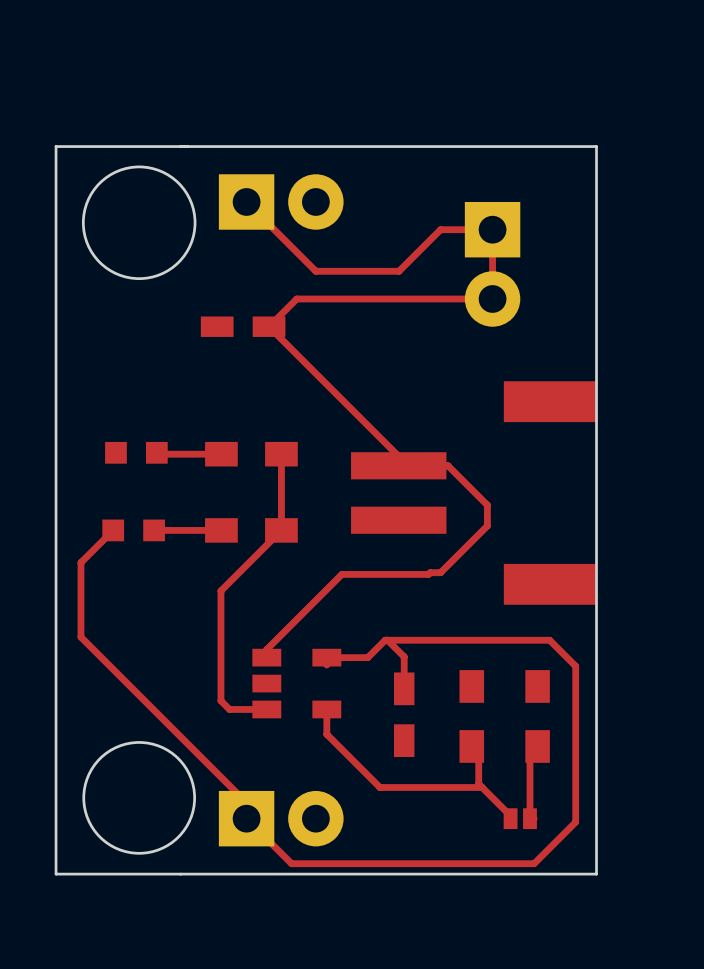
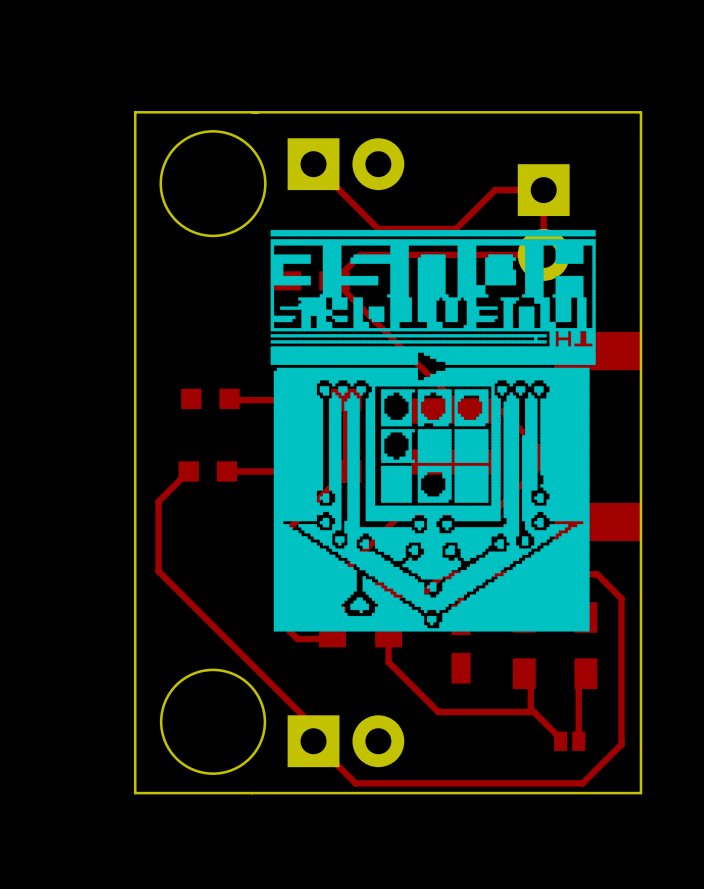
drawing: none -> [270, 229, 596, 632]

